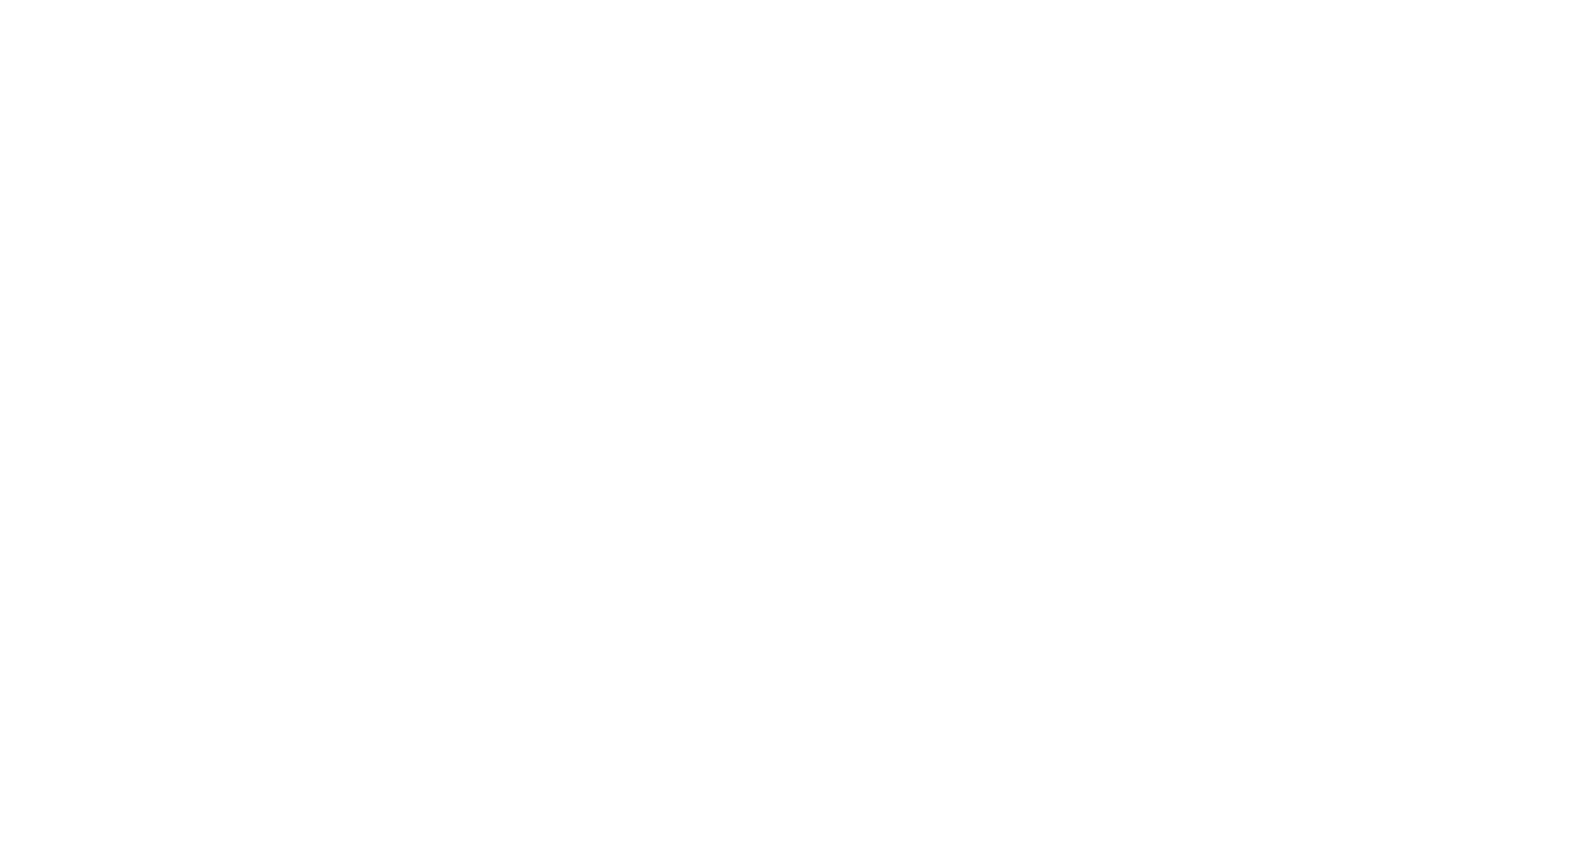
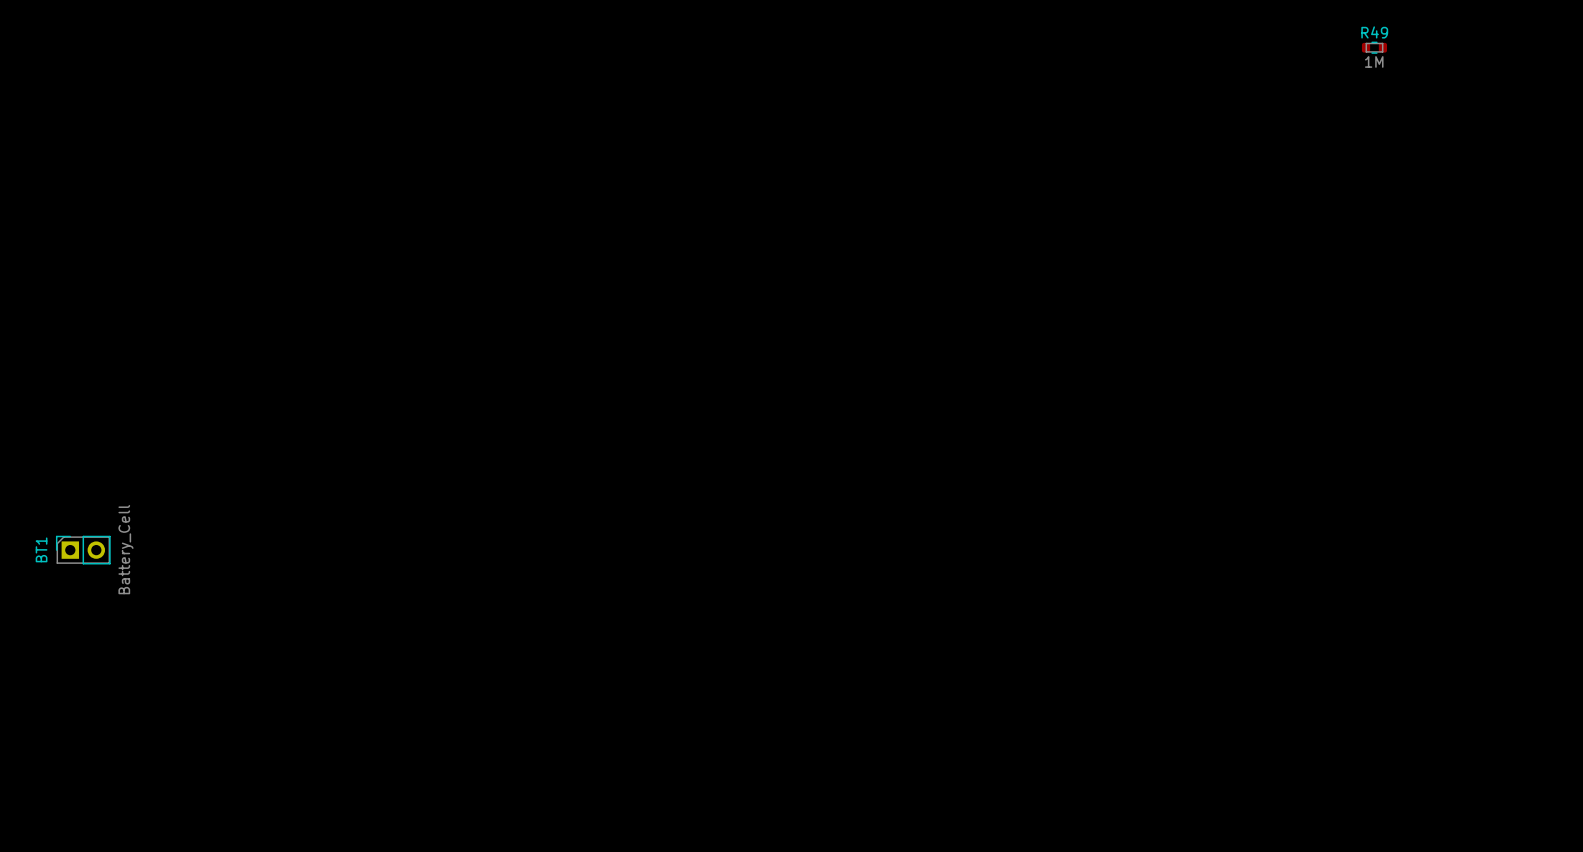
R49: none -> 1M (1374, 47)
BT1: none -> Battery_Cell (83, 550)

